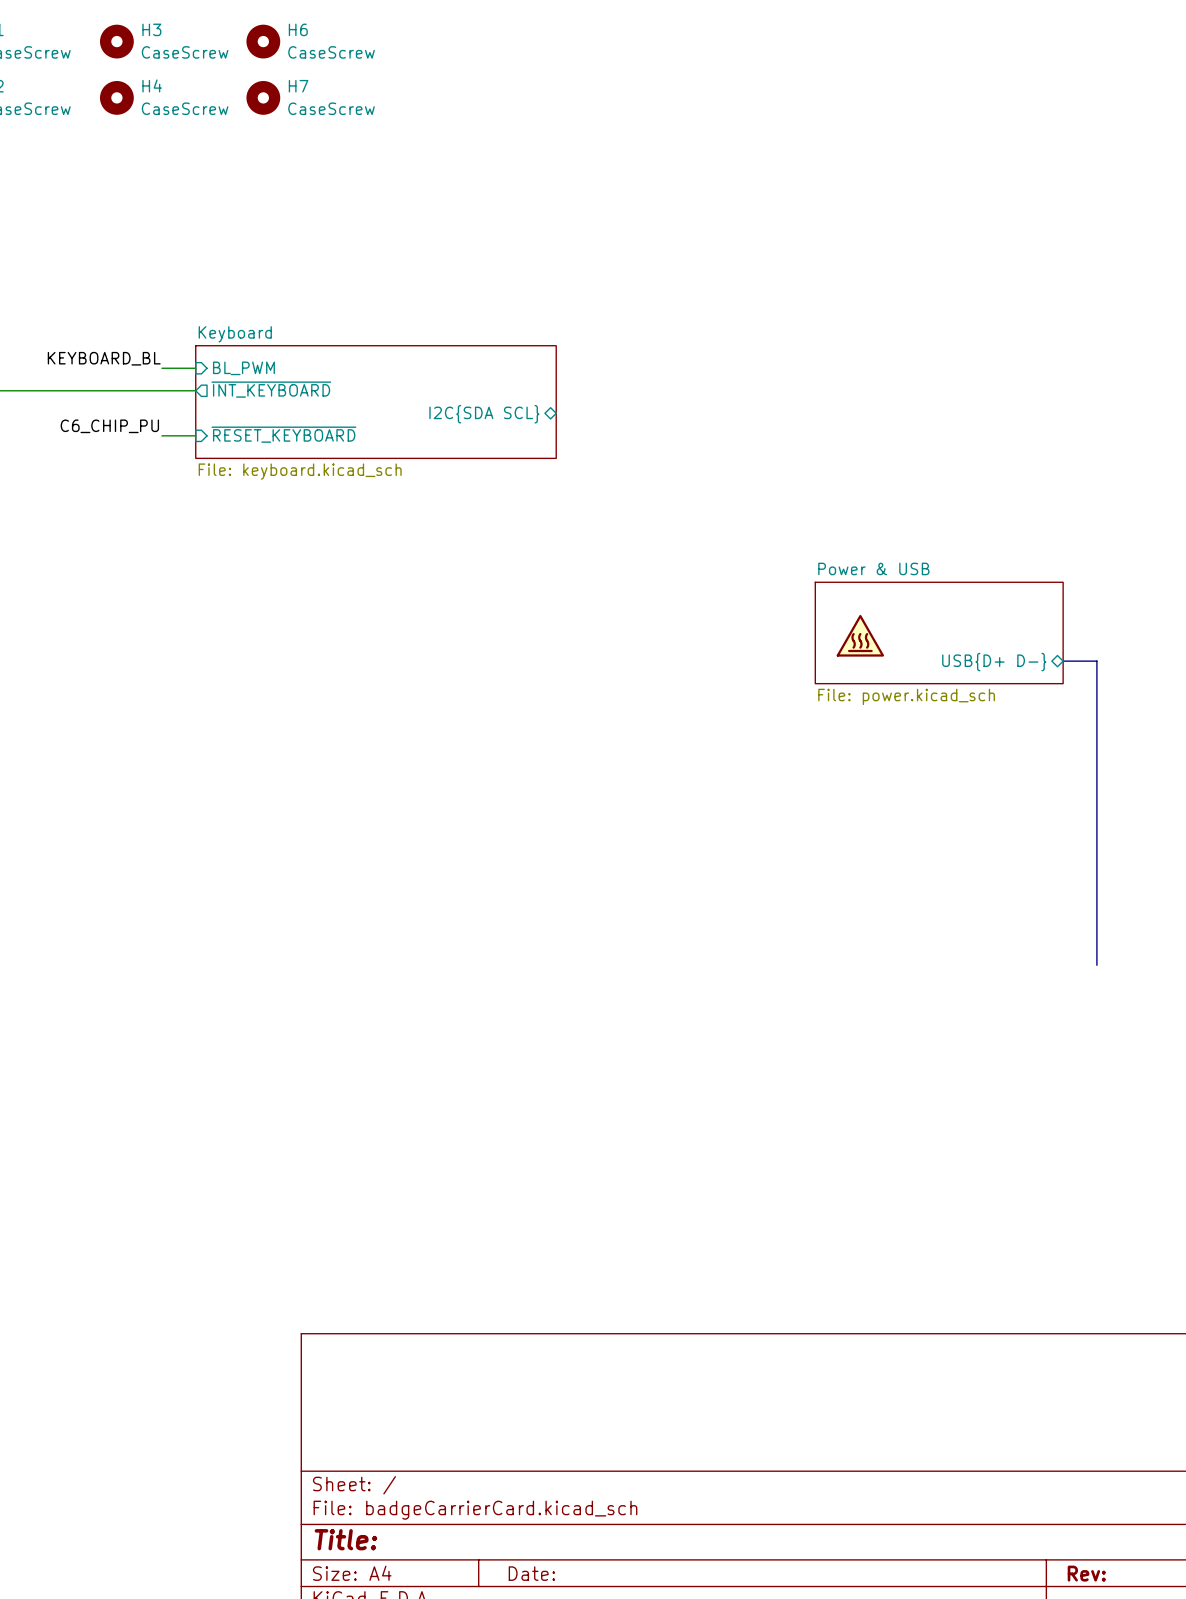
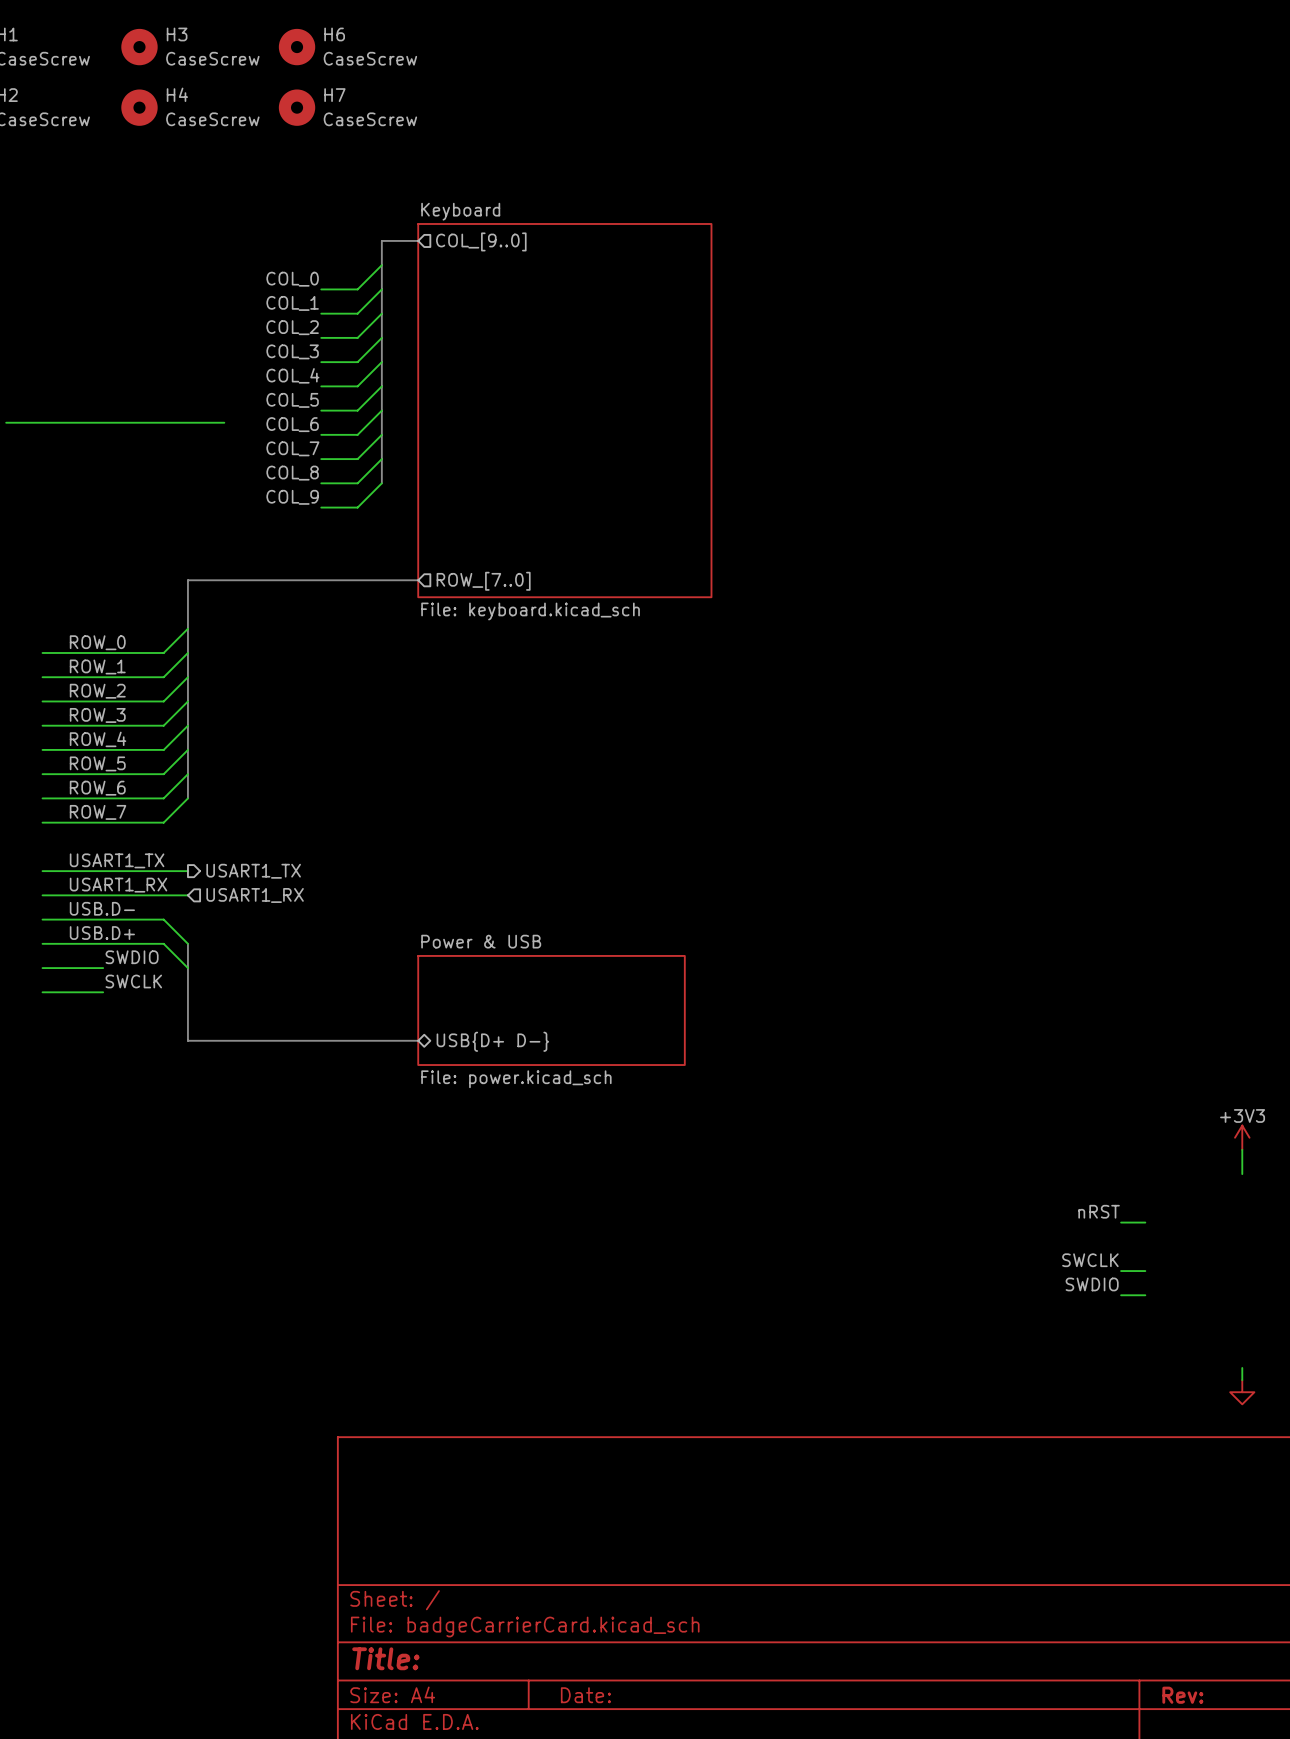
bus: none -> (418, 240) (381, 240) (381, 483)
sheet pin: none -> COL_[9..0] (481, 241)
wire: none -> (381, 265) (357, 289) (321, 289)
label: none -> COL_0 (292, 279)
wire: none -> (381, 289) (357, 313) (321, 313)
label: none -> COL_1 (292, 303)
wire: none -> (381, 313) (357, 337) (321, 337)
label: none -> COL_2 (292, 327)
wire: none -> (381, 337) (357, 362) (321, 362)
label: none -> COL_3 (292, 351)
wire: none -> (381, 362) (357, 386) (321, 386)
label: none -> COL_4 (292, 375)
wire: none -> (381, 386) (357, 410) (321, 410)
label: KEYBOARD_BL (104, 358) -> none
wire: (161, 368) (195, 368) -> none
sheet pin: BL_PWM (243, 368) -> none
label: none -> COL_5 (292, 400)
wire: none -> (381, 410) (357, 434) (321, 434)
sheet Keyboard: none -> File: keyboard.kicad_sch (564, 410)
sheet pin: ~{INT_KEYBOARD} (271, 389) -> none
label: none -> COL_6 (292, 424)
wire: none -> (381, 434) (357, 459) (321, 459)
sheet Keyboard: File: keyboard.kicad_sch (375, 402) -> none
sheet pin: I2C{SDA SCL} (484, 414) -> none
label: none -> COL_7 (292, 448)
wire: none -> (381, 459) (357, 483) (321, 483)
label: C6_CHIP_PU (109, 426) -> none
sheet pin: ~{RESET_KEYBOARD} (283, 434) -> none
wire: (161, 435) (195, 435) -> none
label: none -> COL_8 (292, 473)
wire: none -> (381, 483) (357, 507) (321, 507)
label: none -> COL_9 (292, 497)
bus: none -> (418, 580) (187, 580) (187, 798)
sheet pin: none -> ROW_[7..0] (483, 581)
wire: none -> (187, 628) (163, 652) (42, 652)
label: none -> ROW_0 (97, 642)
wire: none -> (187, 652) (163, 677) (42, 677)
label: none -> ROW_1 (97, 666)
wire: none -> (187, 677) (163, 701) (42, 701)
sheet Power & USB: File: power.kicad_sch (939, 632) -> none
power symbol: (860, 635) -> none
label: none -> ROW_2 (97, 691)
wire: none -> (187, 701) (163, 725) (42, 725)
bus: (1063, 661) (1096, 661) (1096, 965) -> none
label: none -> ROW_3 (97, 715)
sheet pin: USB{D+ D-} (994, 662) -> none
wire: none -> (187, 725) (163, 749) (42, 749)
label: none -> ROW_4 (98, 739)
wire: none -> (187, 749) (163, 774) (42, 774)
label: none -> ROW_5 (97, 763)
wire: none -> (187, 774) (163, 798) (42, 798)
label: none -> ROW_6 (97, 788)
wire: none -> (187, 798) (163, 822) (42, 822)
label: none -> ROW_7 (98, 812)
label: none -> USART1_TX (117, 860)
wire: none -> (42, 871) (187, 871)
hierarchical label: none -> USART1_TX (253, 871)
label: none -> USART1_RX (118, 885)
wire: none -> (42, 895) (187, 895)
hierarchical label: none -> USART1_RX (255, 895)
label: none -> USB.D- (102, 908)
wire: none -> (42, 919) (163, 919) (187, 943)
label: none -> USB.D+ (102, 933)
wire: none -> (42, 943) (163, 943) (187, 968)
bus: none -> (187, 943) (187, 1040) (418, 1040)
label: none -> SWDIO (132, 957)
wire: none -> (42, 968) (103, 968)
label: none -> SWCLK (133, 981)
wire: none -> (42, 992) (103, 992)
sheet Power & USB: none -> File: power.kicad_sch (551, 1010)
sheet pin: none -> USB{D+ D-} (492, 1041)
power symbol: none -> +3V3 (1242, 1137)
wire: none -> (1242, 1149) (1242, 1174)
label: none -> nRST (1099, 1211)
wire: none -> (1121, 1222) (1145, 1222)
label: none -> SWCLK (1090, 1260)
wire: none -> (1121, 1271) (1145, 1271)
label: none -> SWDIO (1092, 1284)
wire: none -> (1121, 1295) (1145, 1295)
wire: none -> (1242, 1367) (1242, 1380)
power symbol: none -> (1242, 1392)

